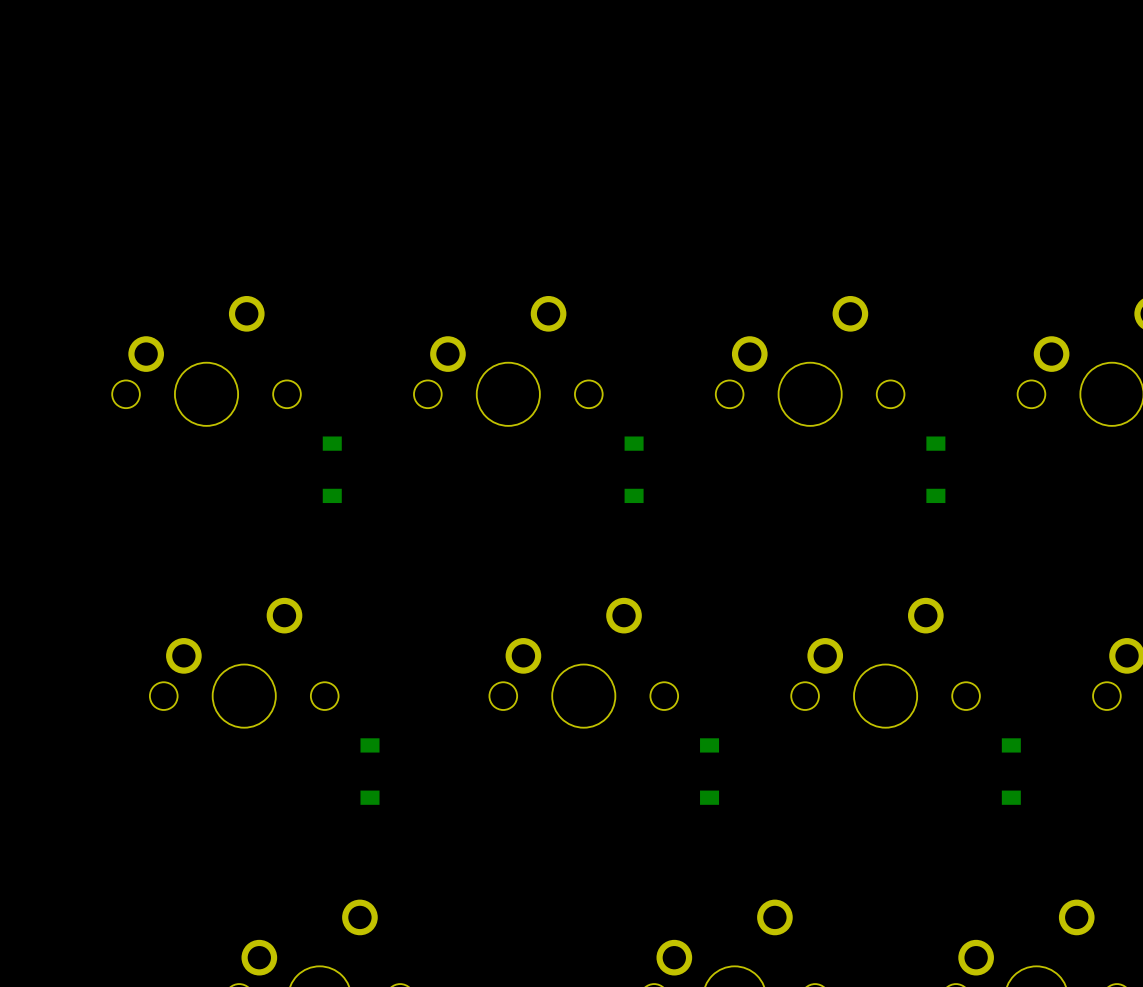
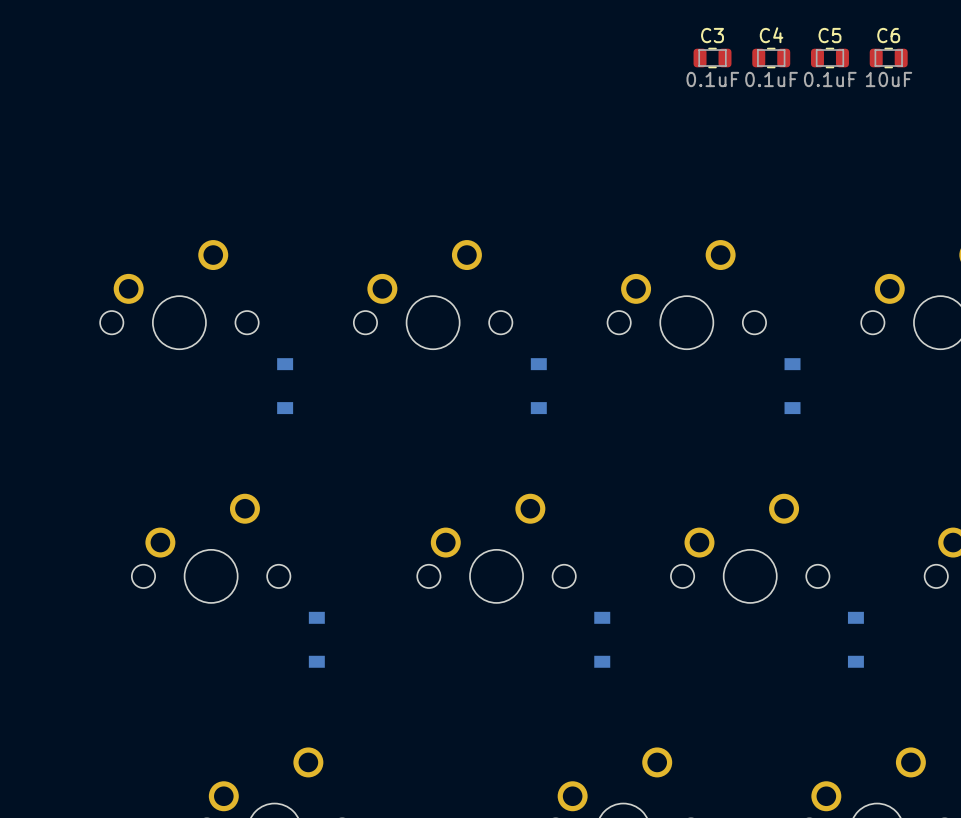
C3: none -> 0.1uF (712, 58)
C4: none -> 0.1uF (771, 58)
C5: none -> 0.1uF (829, 58)
C6: none -> 10uF (888, 58)

